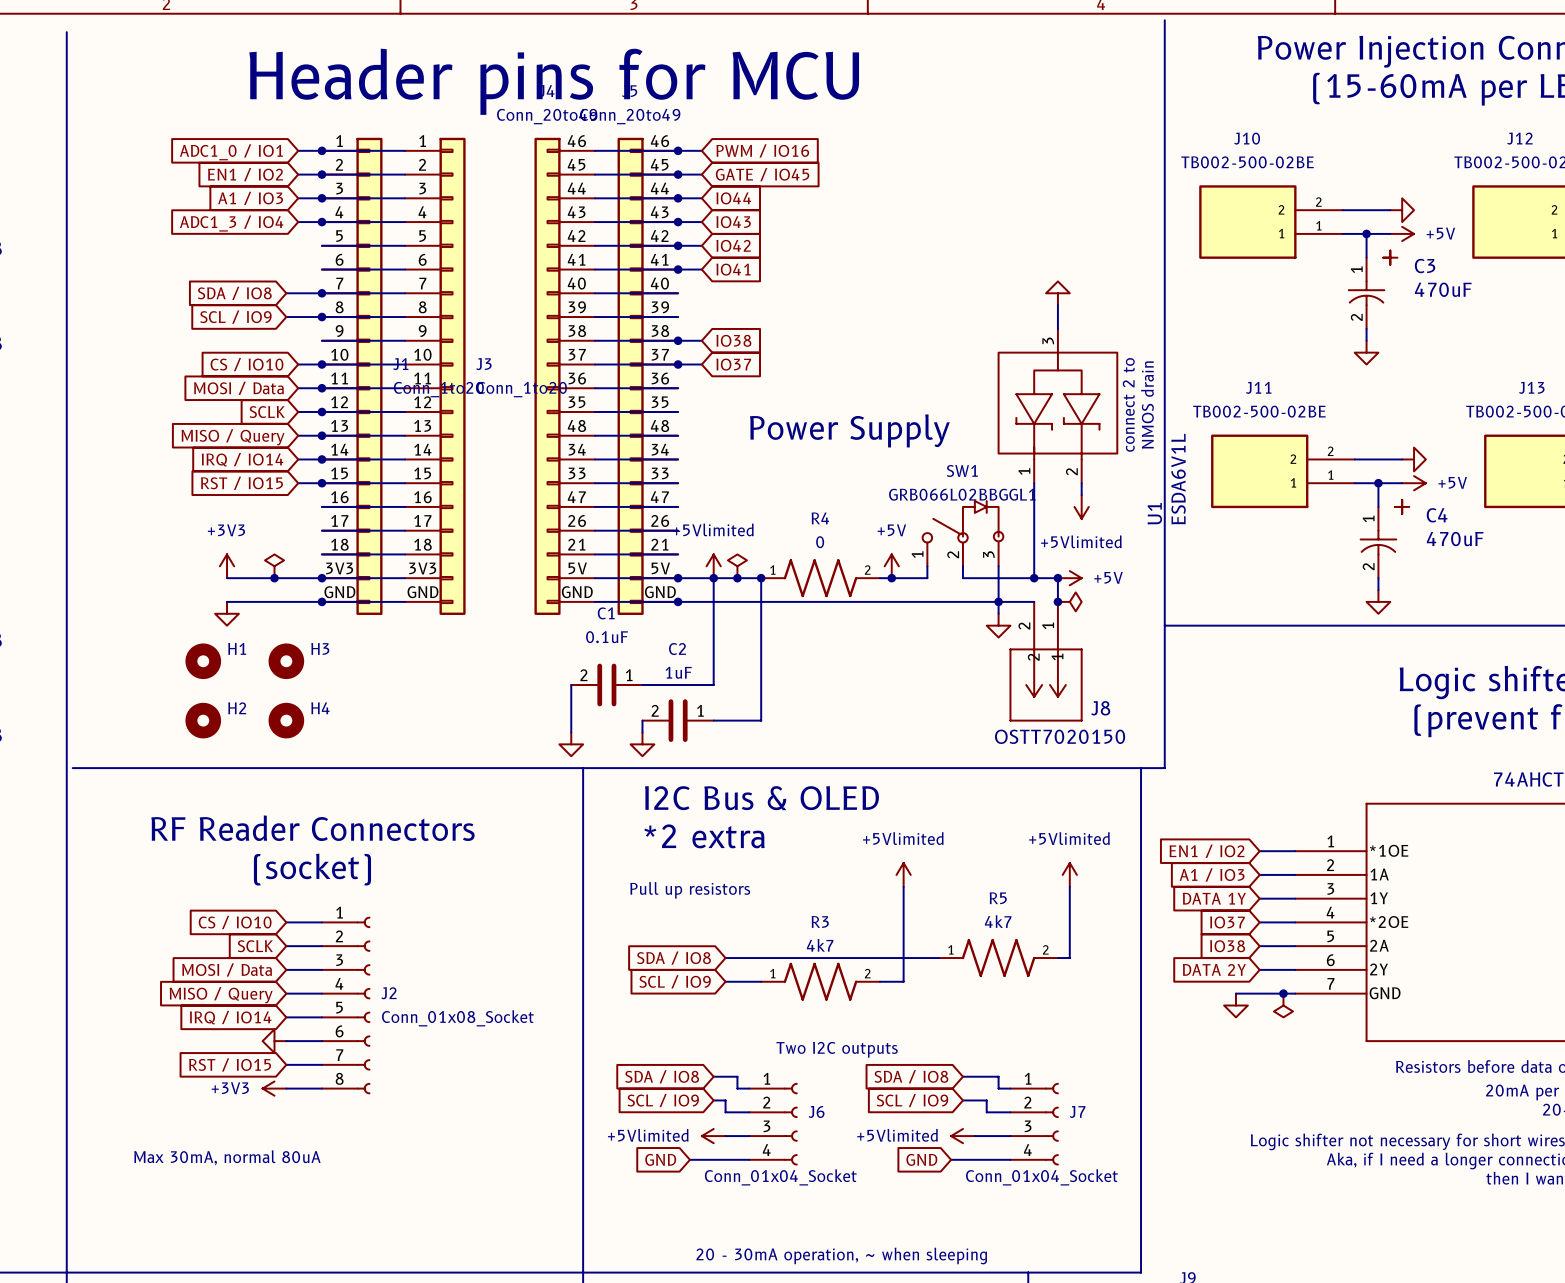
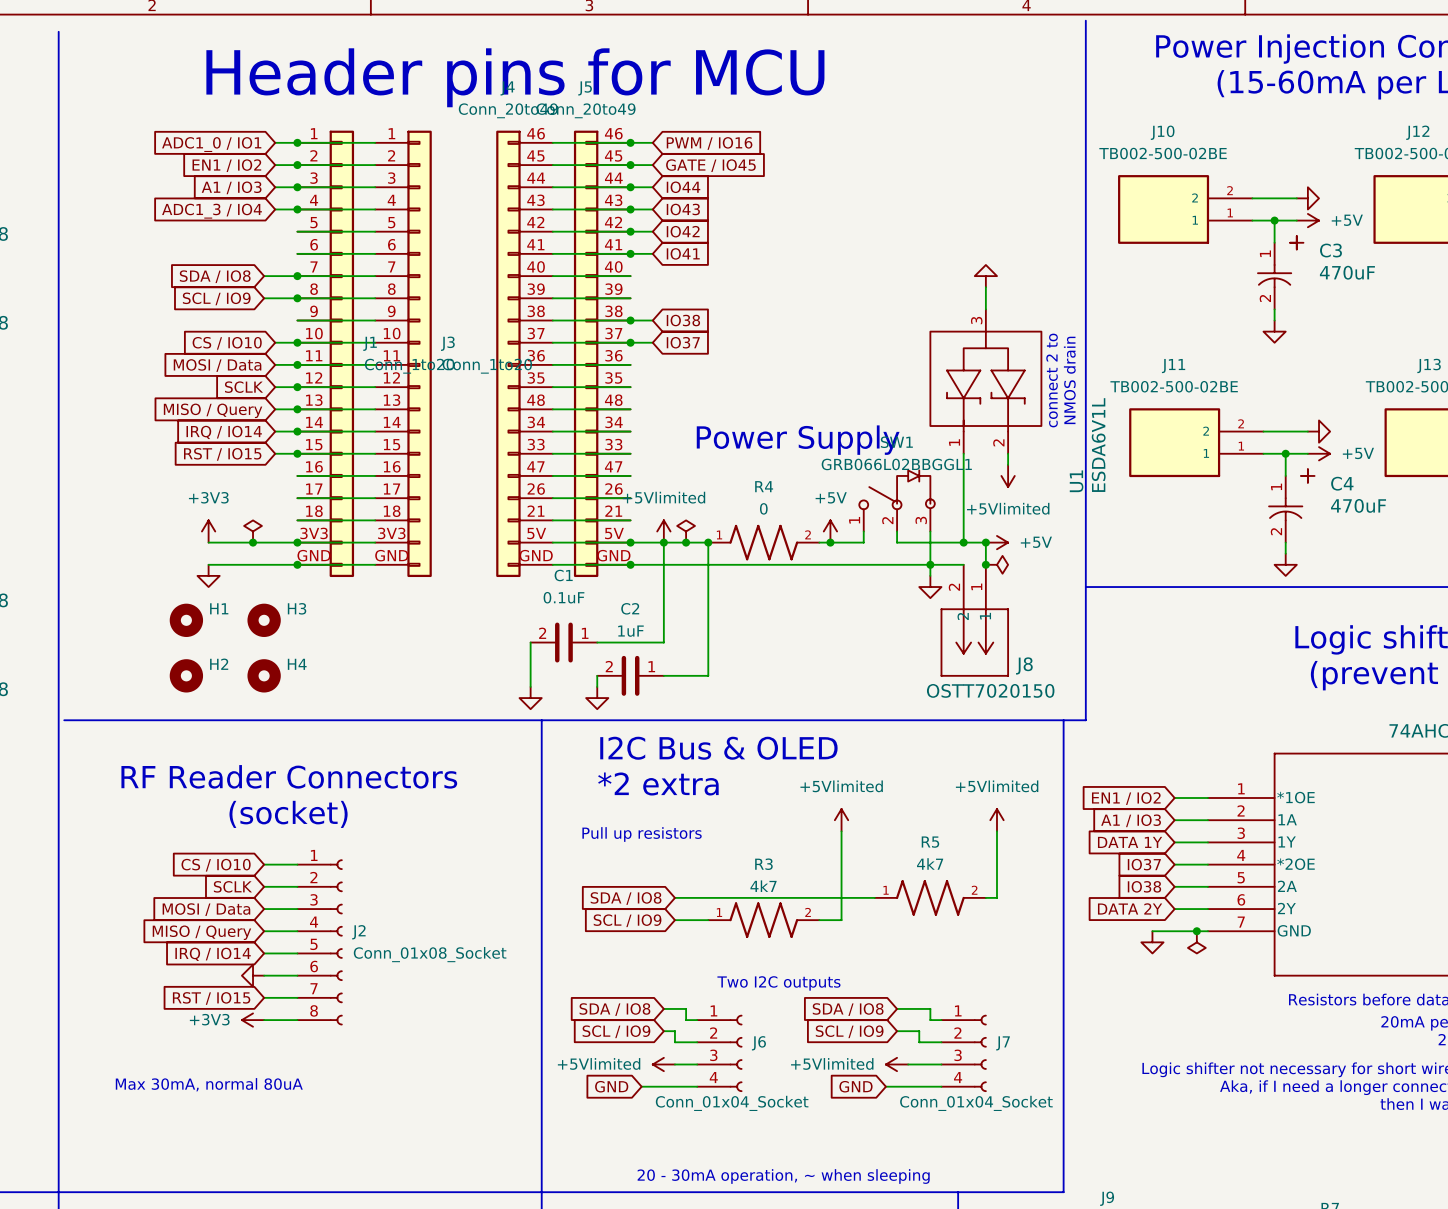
text position: Power Supply (849, 430) -> Power Supply (798, 440)

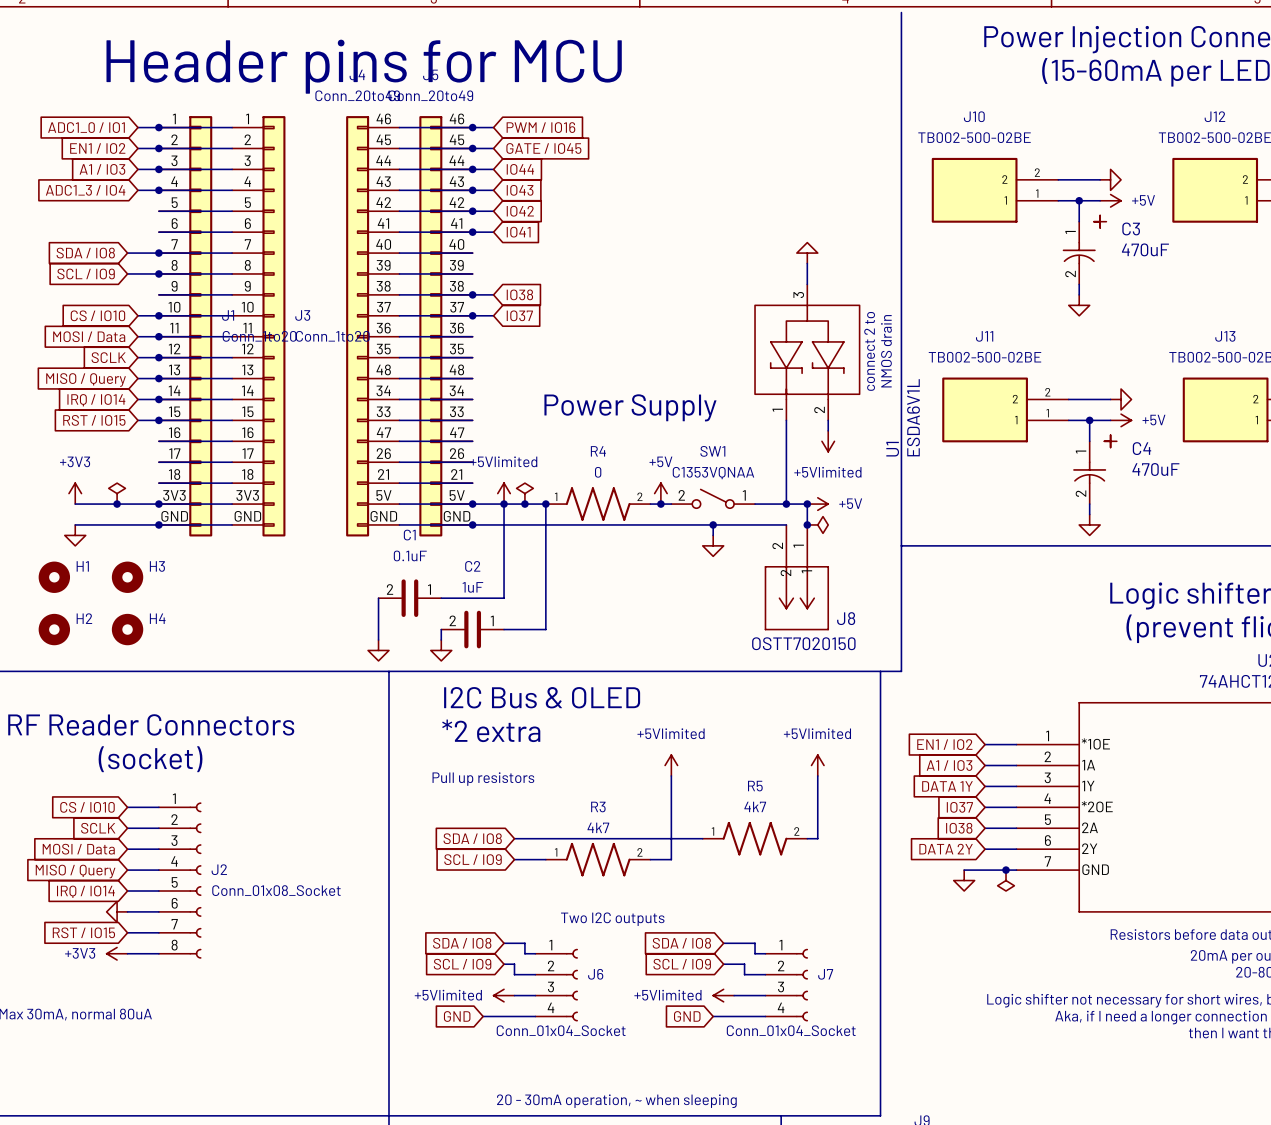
SW1 value: GRB066L02BBGGL1 (896, 464) -> C1353VQNAA (713, 473)
SW1 symbol: [859, 470, 935, 532] -> [671, 489, 756, 509]
wire: (930, 531) (930, 575) -> none
wire: none -> (713, 524) (713, 535)
junction position: (930, 564) -> (713, 524)
power symbol position: (930, 587) -> (713, 545)

